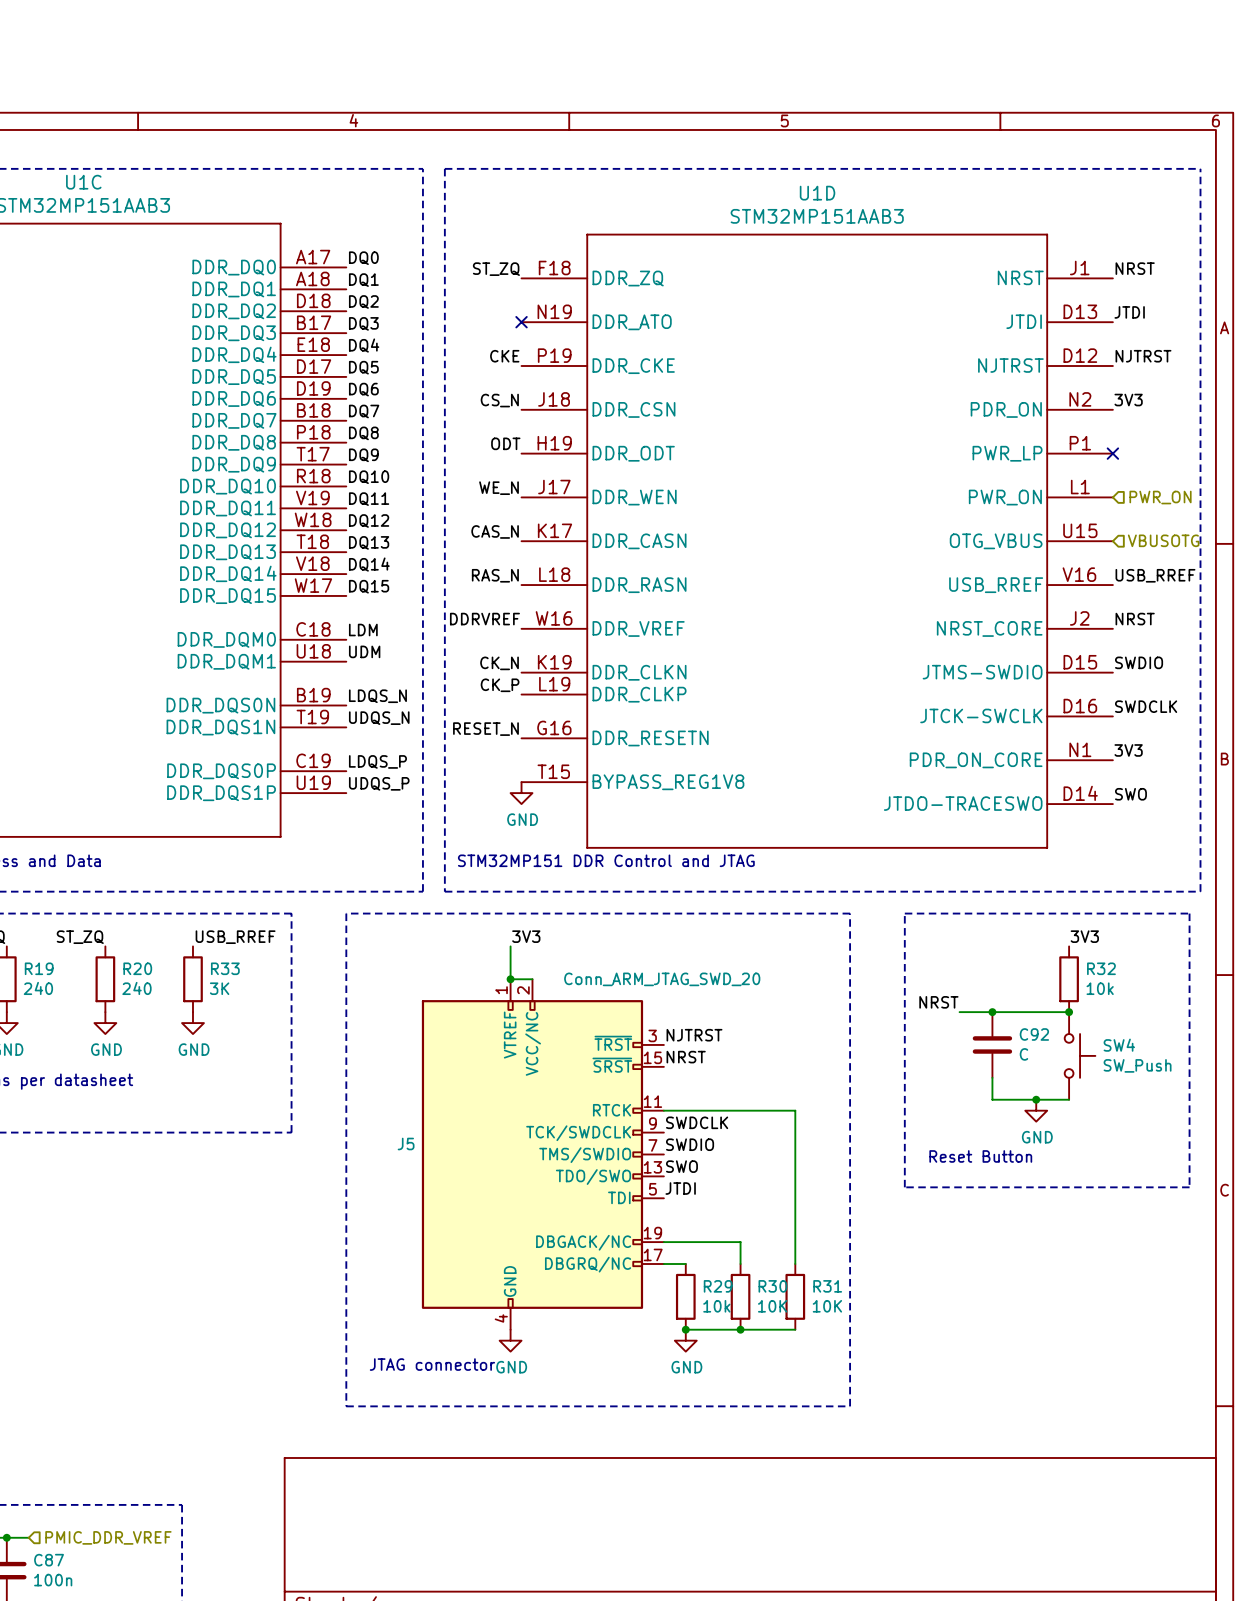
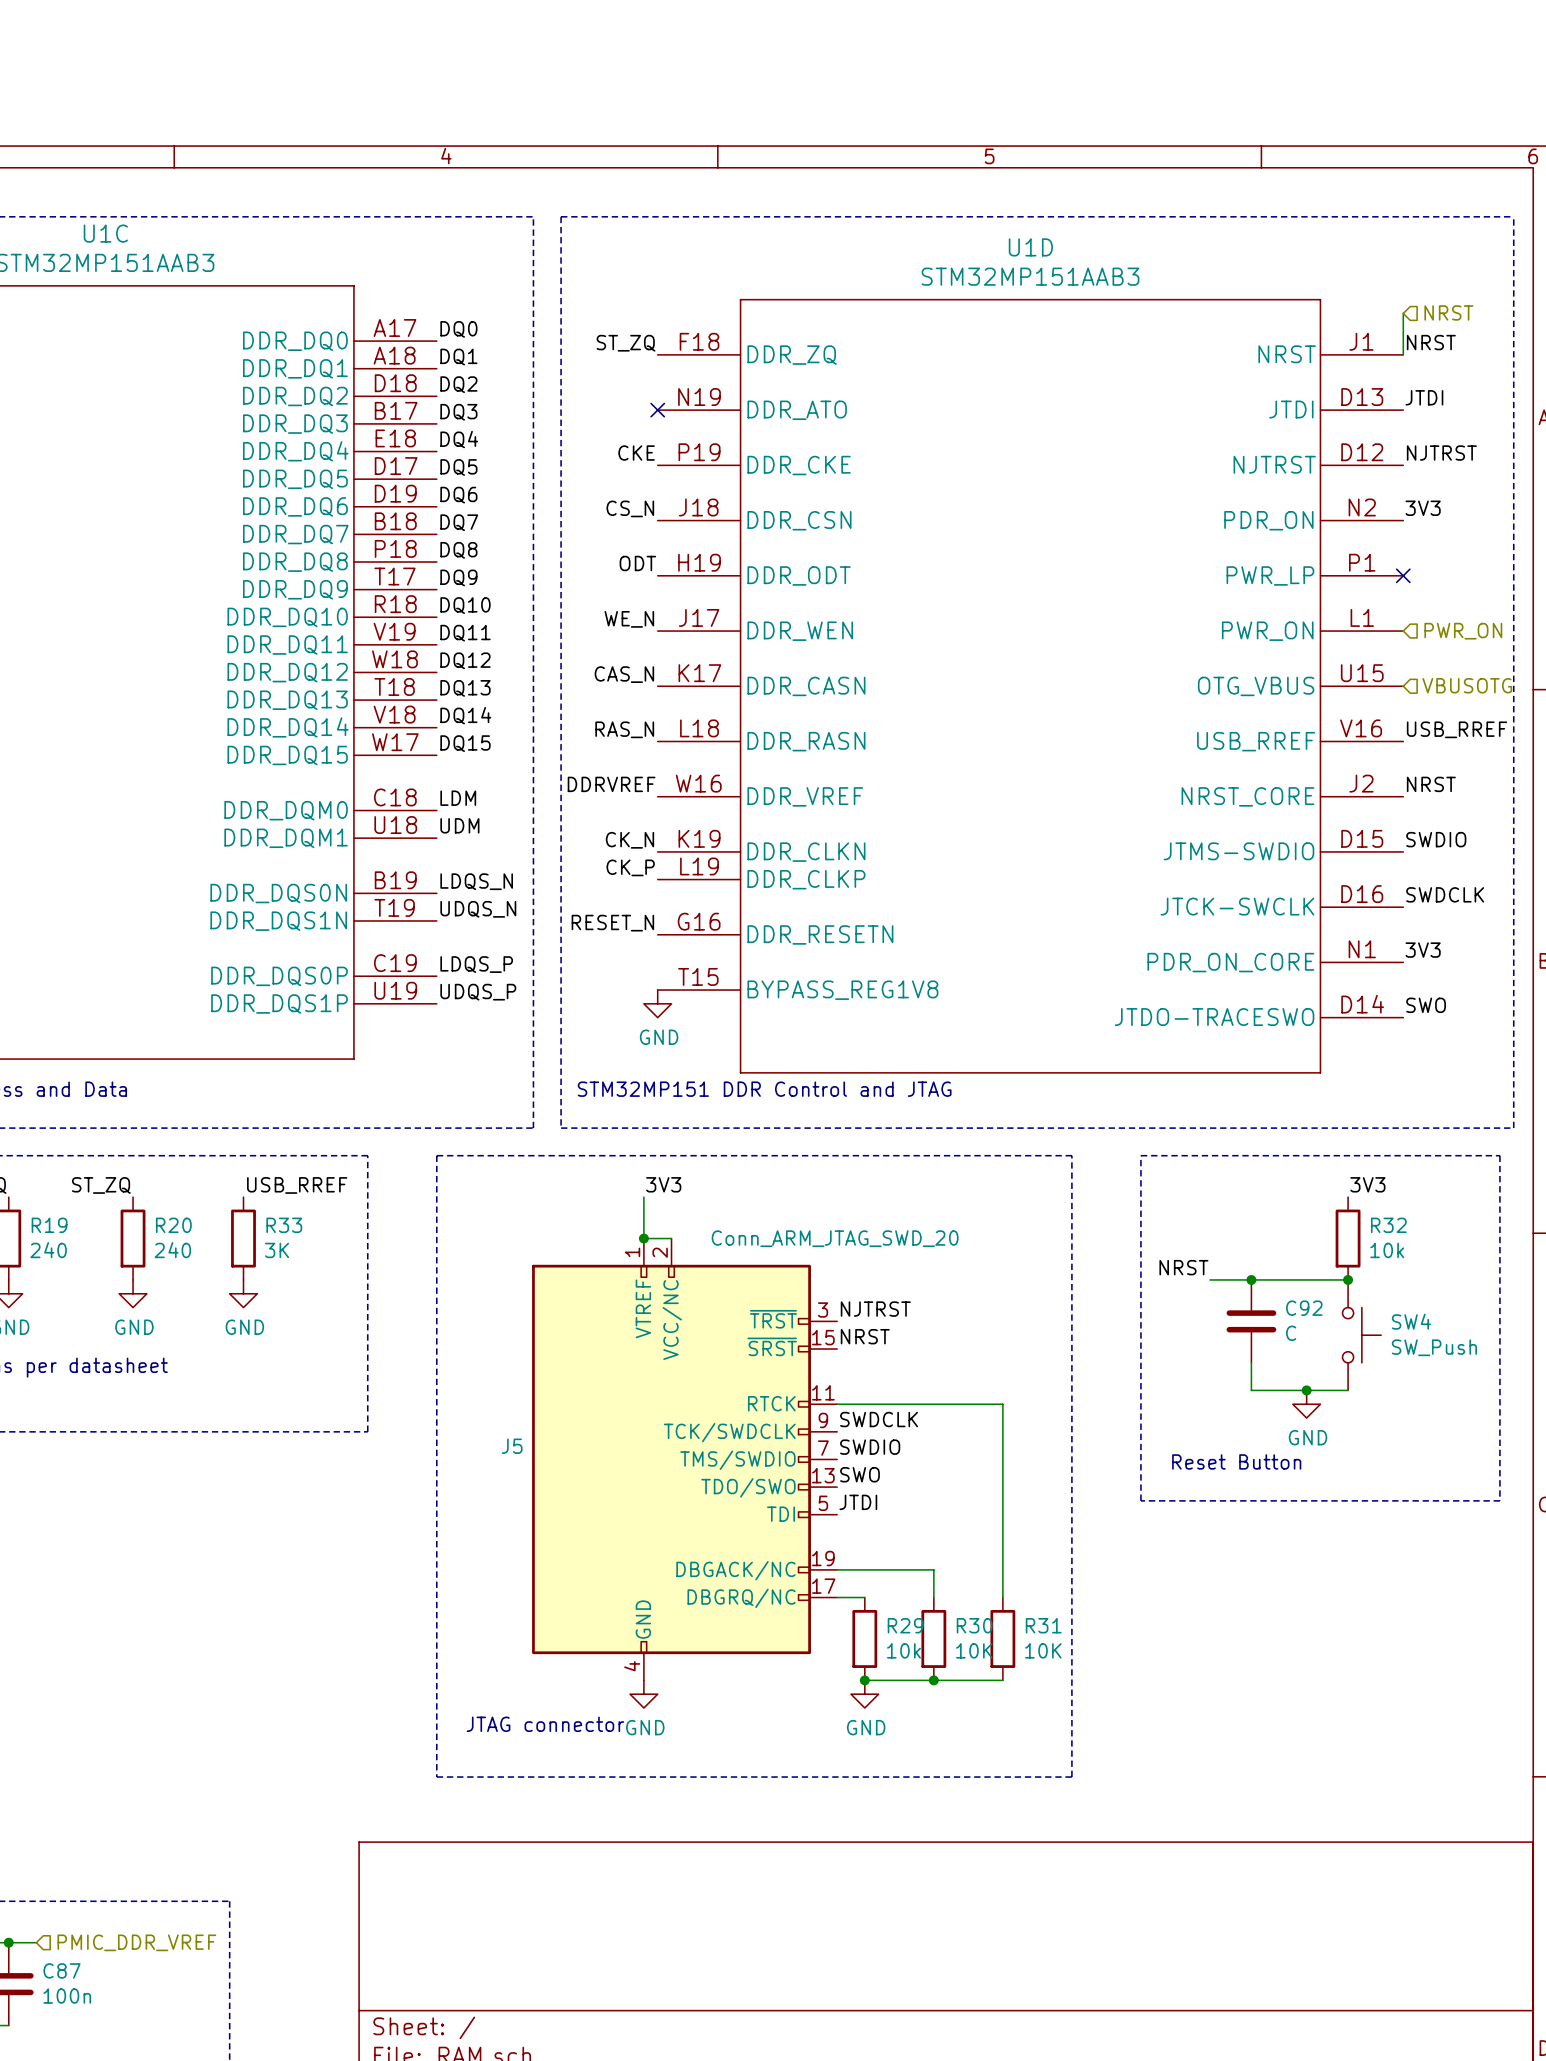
wire: none -> (1403, 313) (1403, 354)
hierarchical label: none -> NRST (1448, 312)

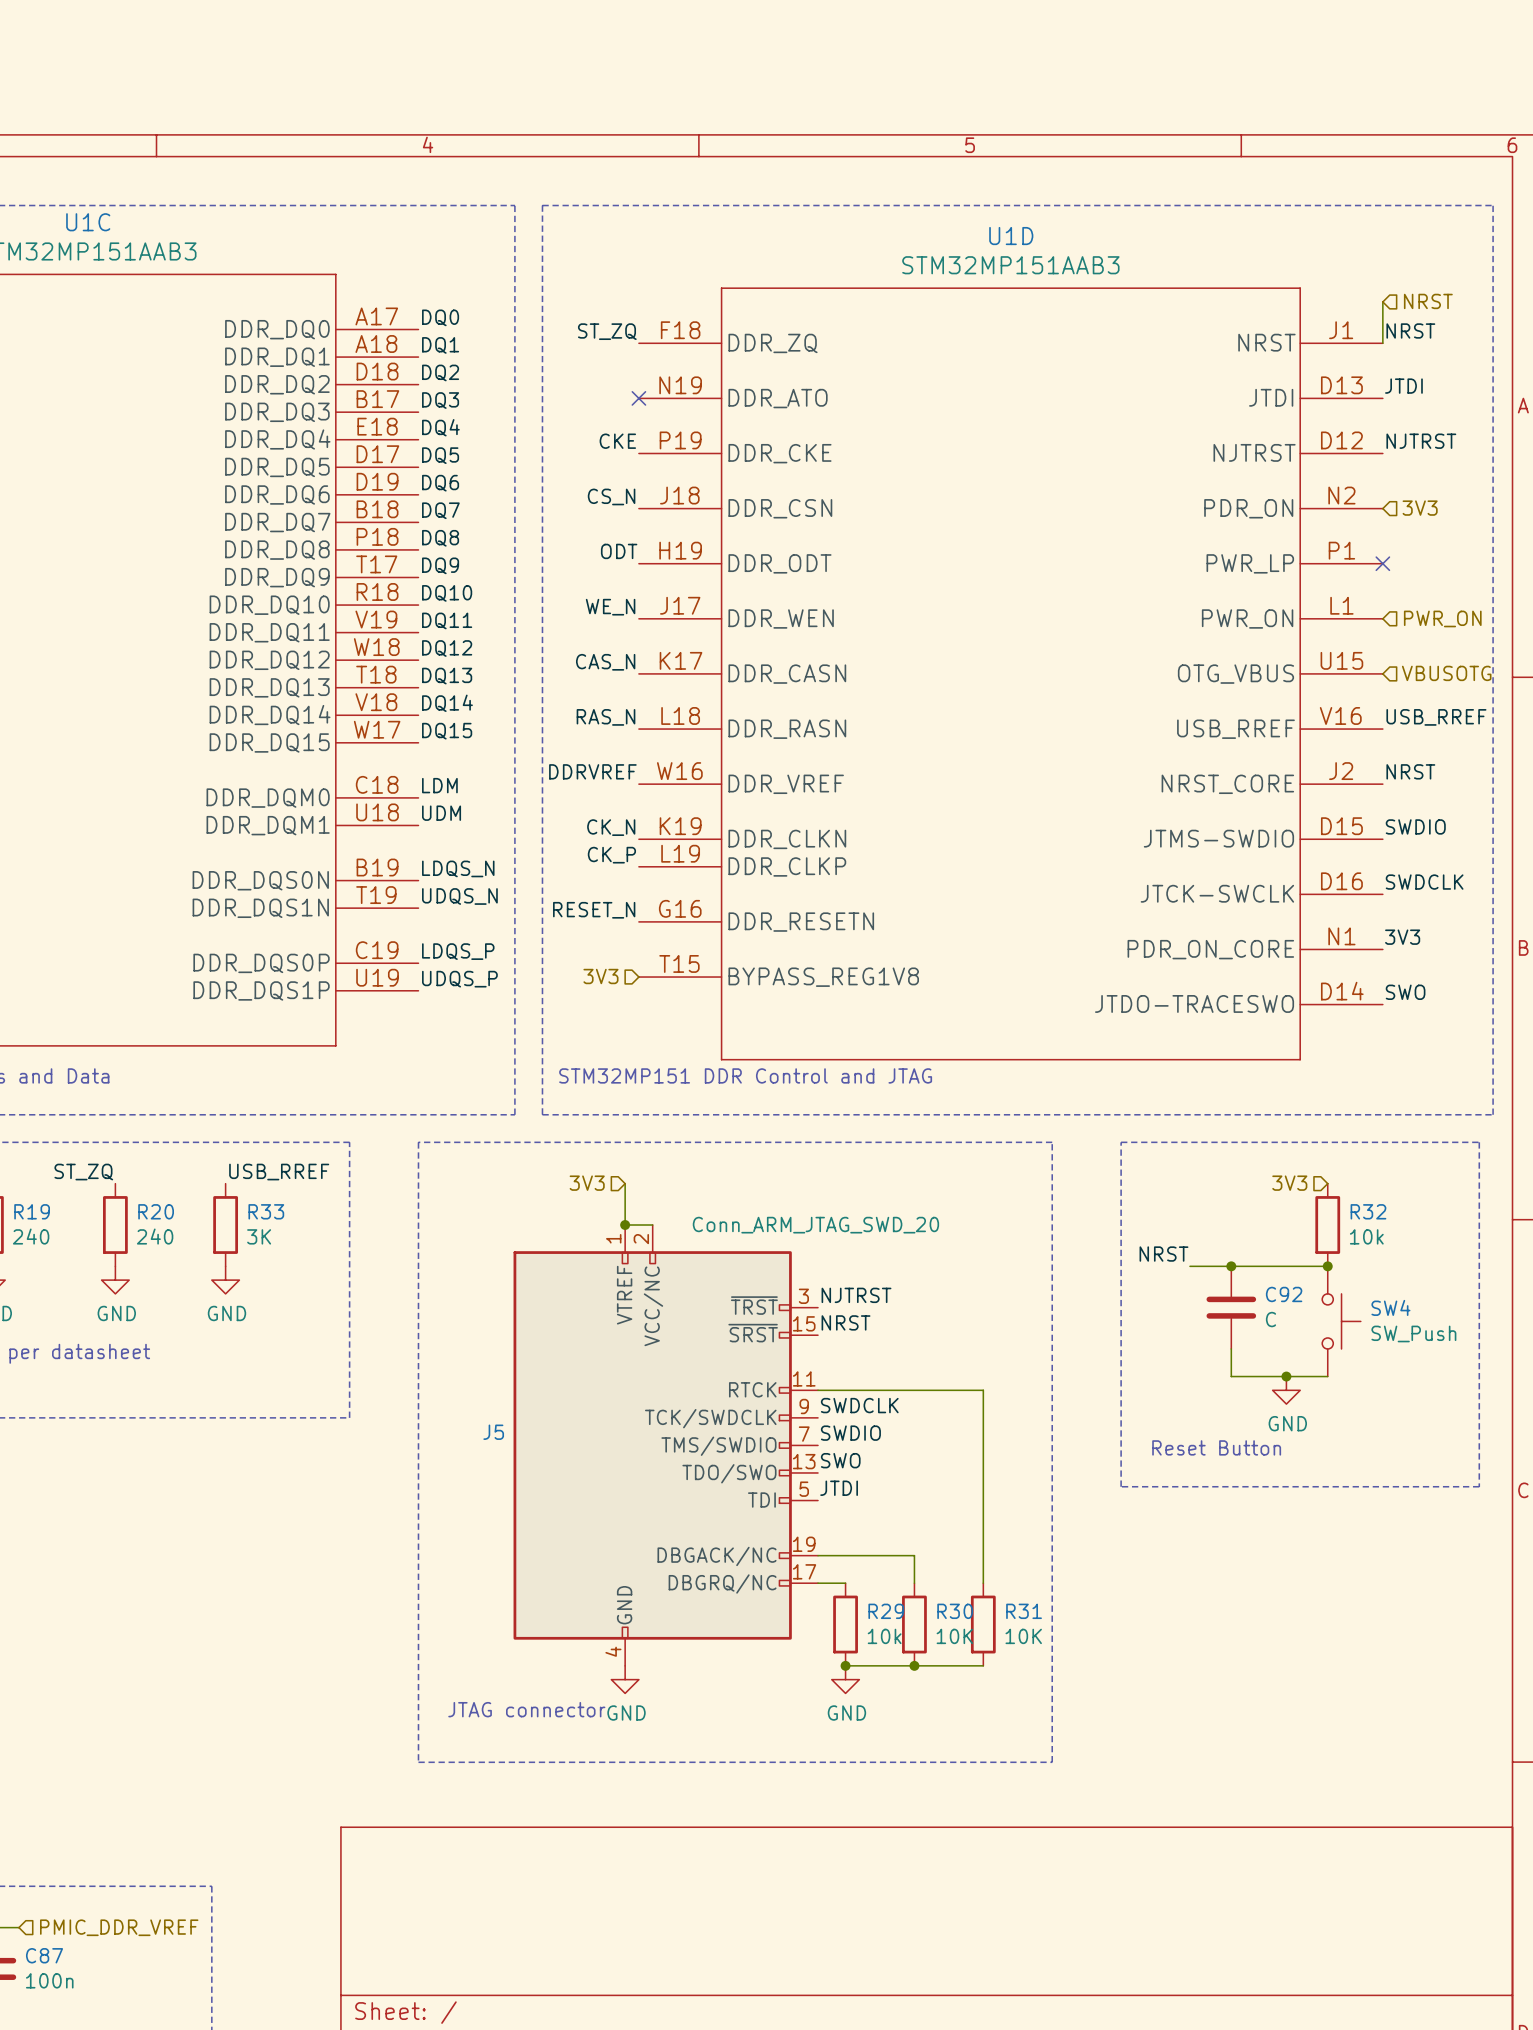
label: 3V3 (1423, 508) -> none
hierarchical label: none -> 3V3 (1420, 508)
hierarchical label: none -> 3V3 (600, 976)
power symbol: GND (657, 1003) -> none
label: 3V3 (663, 1184) -> none
label: 3V3 (1367, 1184) -> none
hierarchical label: none -> 3V3 (587, 1183)
hierarchical label: none -> 3V3 (1289, 1183)

